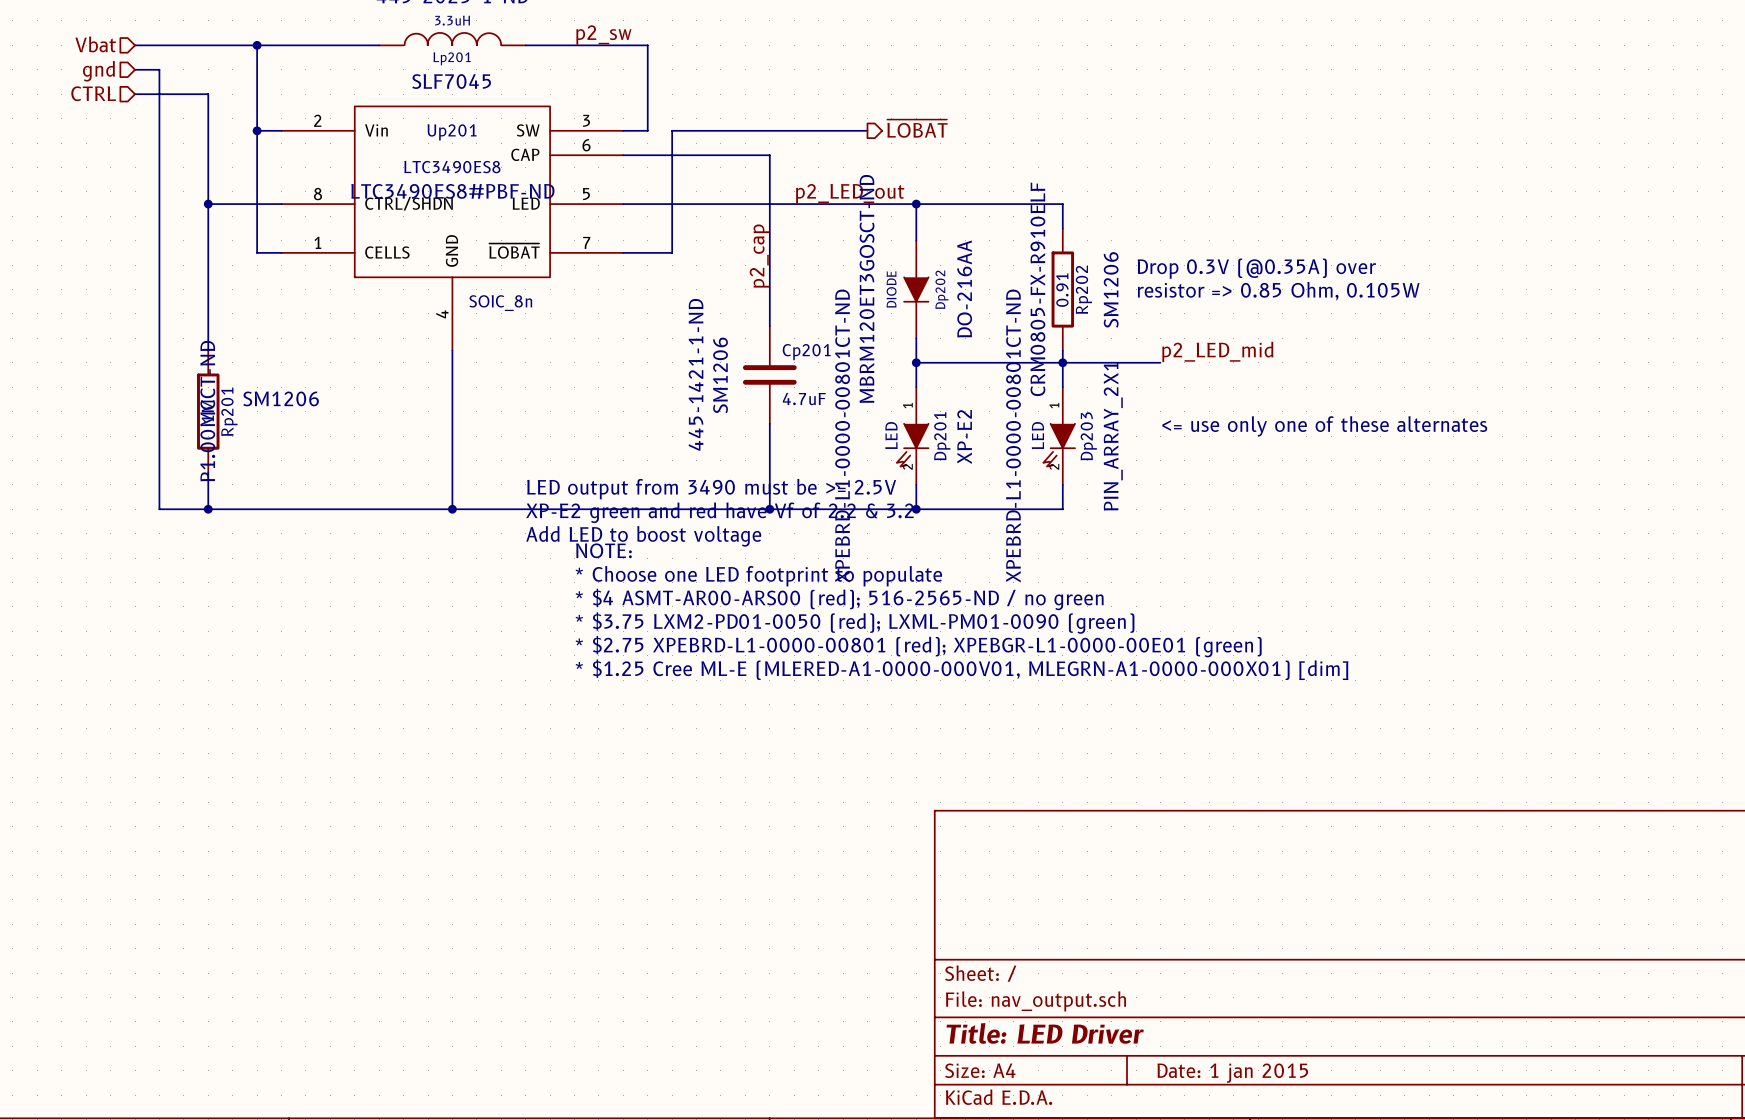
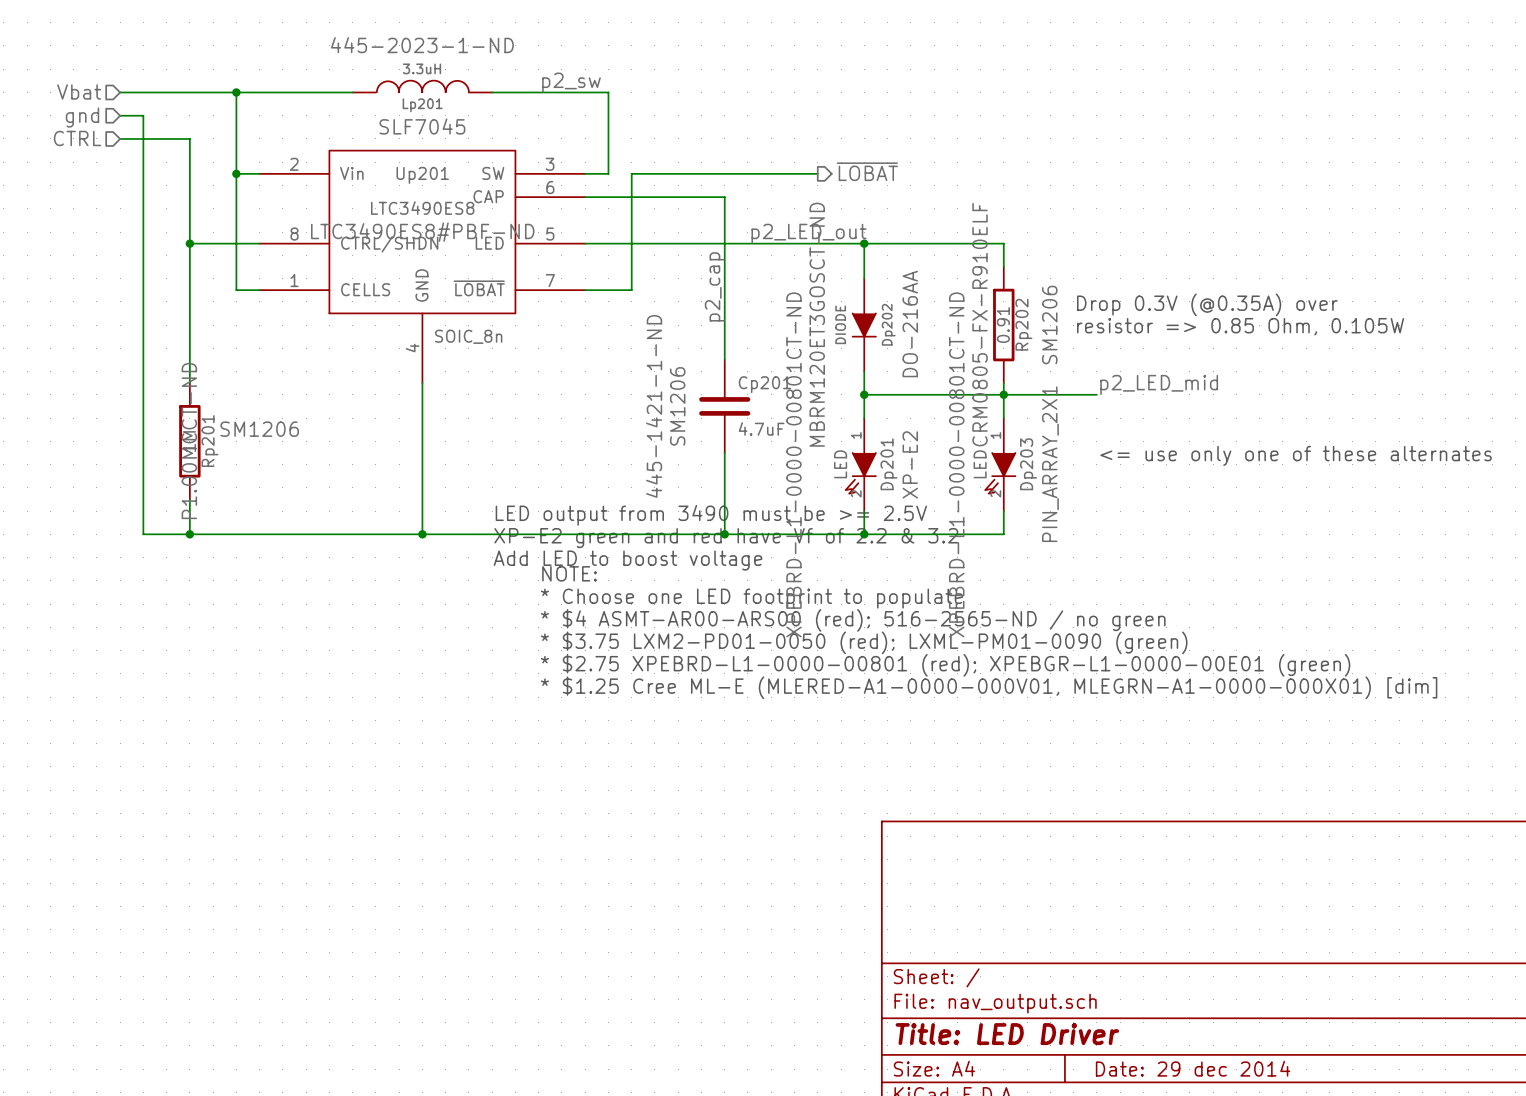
title block: Date: 1 jan 2015 (1232, 1073) -> Date: 29 dec 2014 (1193, 1068)

